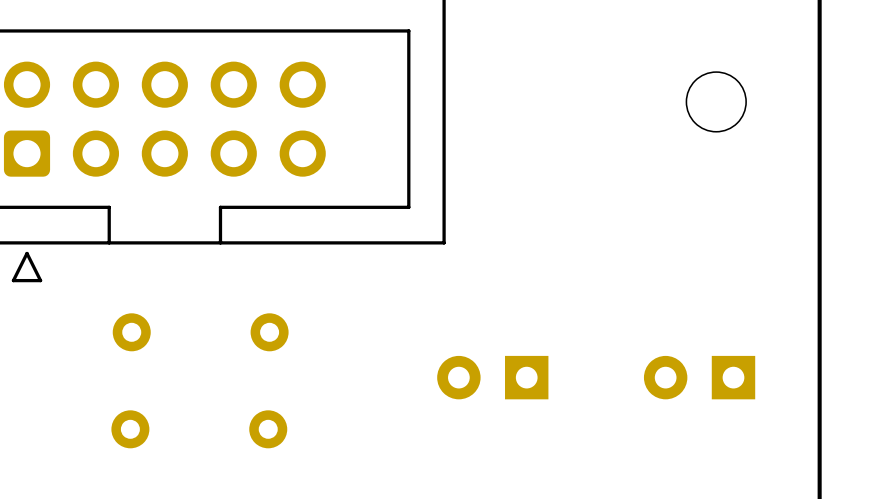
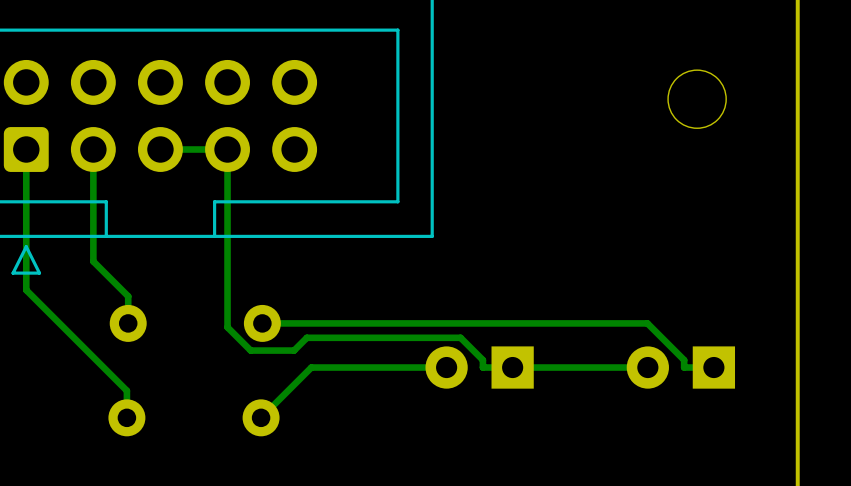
track: none -> (26, 149) (26, 290) (126, 390) (126, 417)
track: none -> (93, 149) (93, 261) (128, 296) (128, 323)
track: none -> (160, 149) (227, 149) (227, 327) (250, 350) (294, 350) (306, 337) (460, 337) (482, 360) (482, 367) (647, 367)
track: none -> (262, 323) (647, 323) (684, 360) (684, 367) (713, 367)
track: none -> (446, 367) (311, 367) (261, 417)

